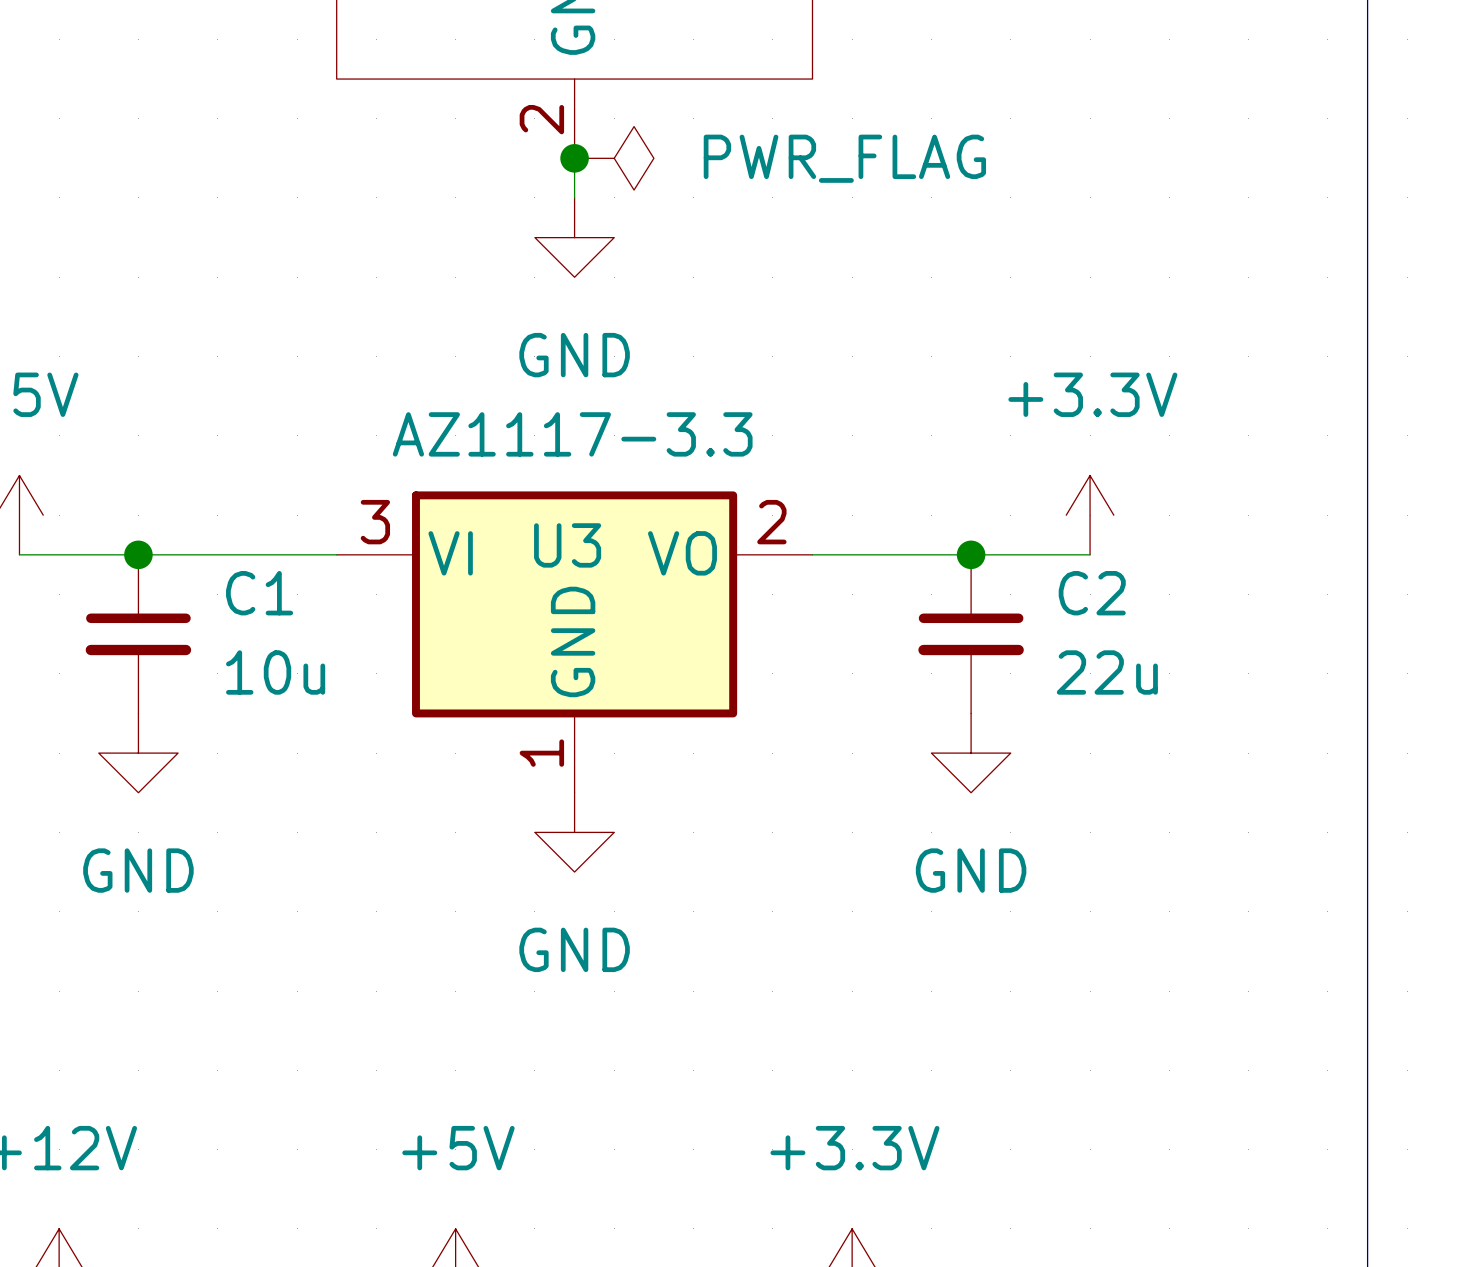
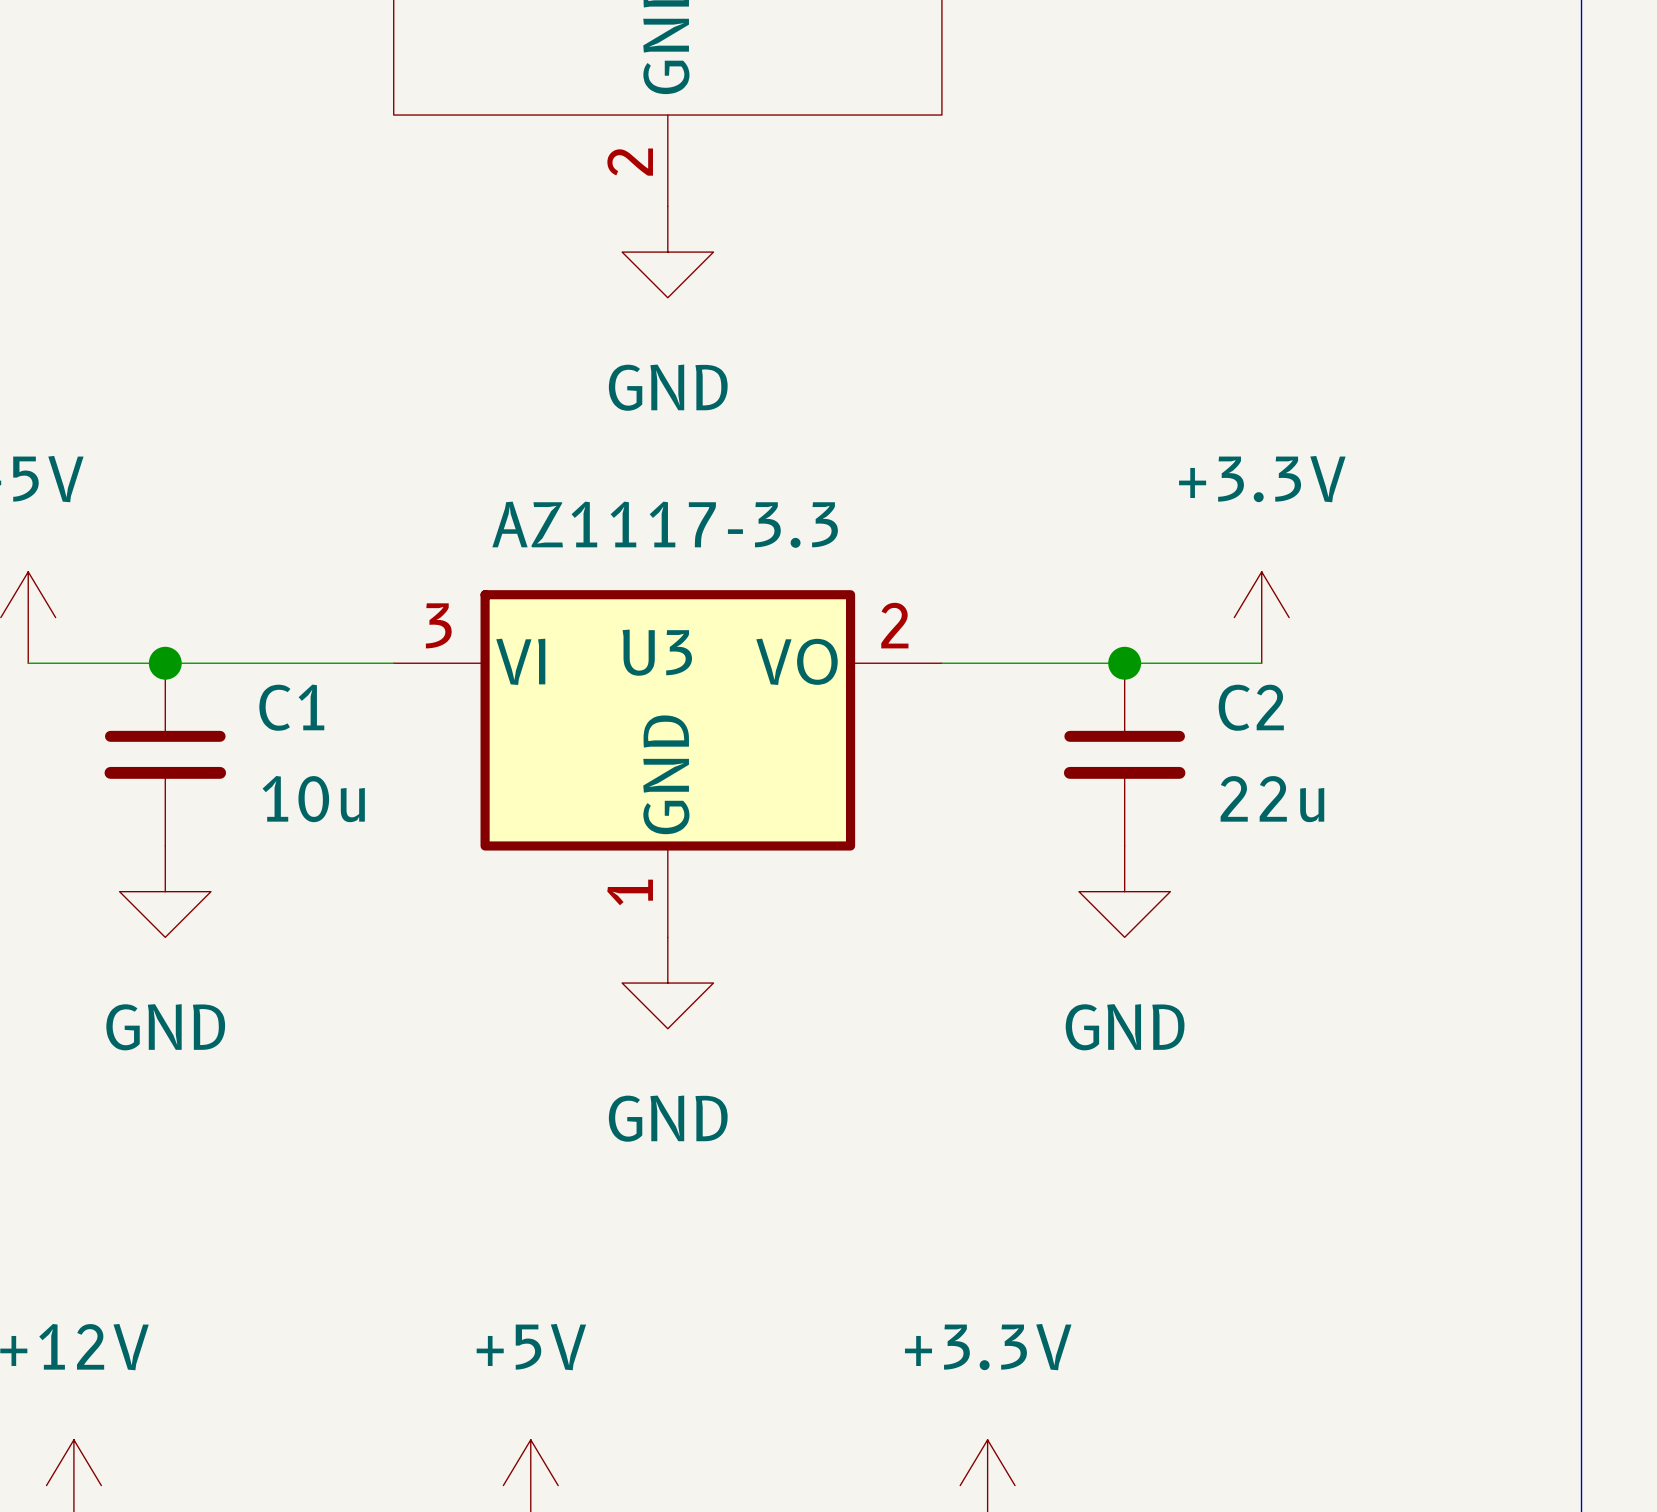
junction: (574, 158) -> none
power symbol: PWR_FLAG (614, 158) -> none
power symbol position: GND (574, 237) -> GND (667, 252)

